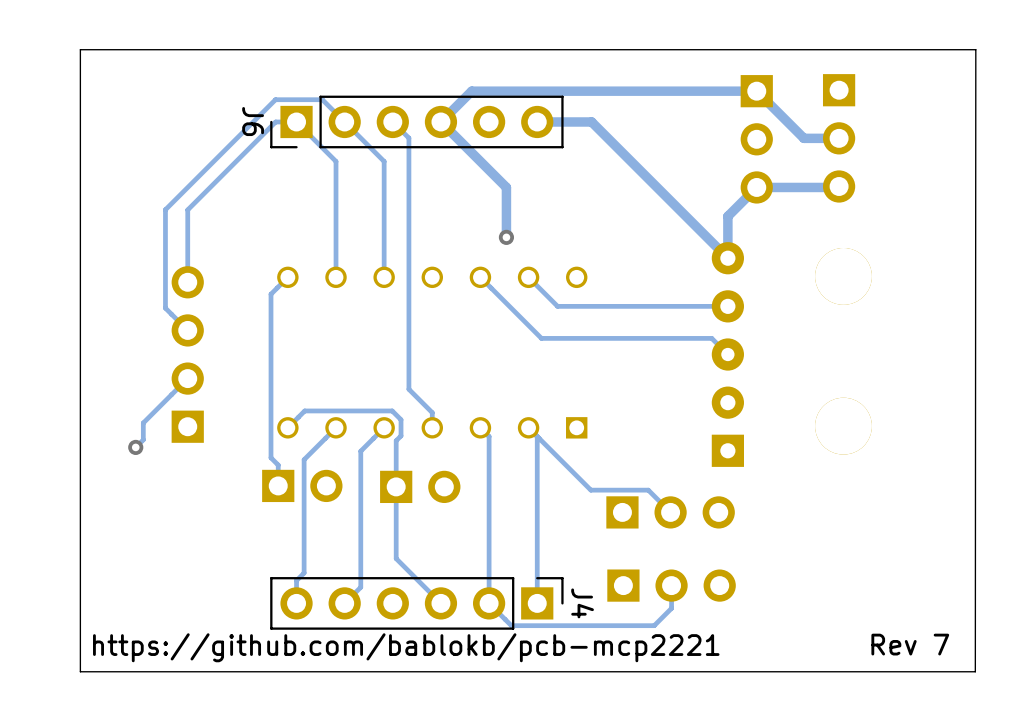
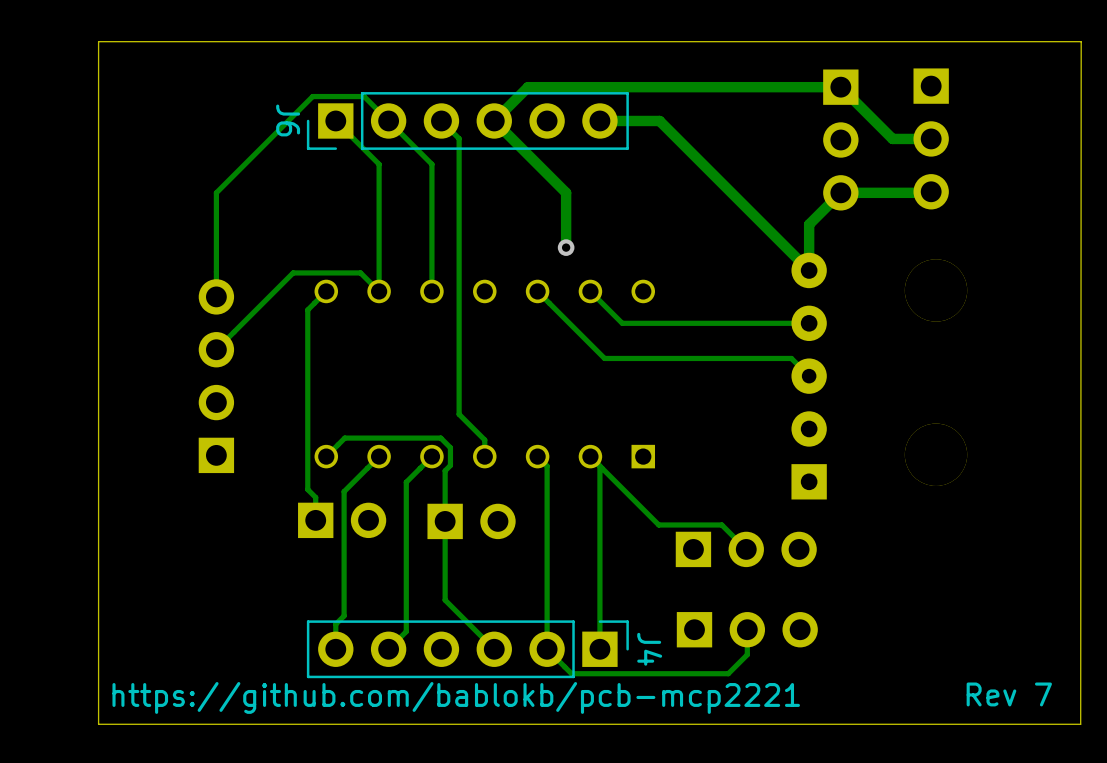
track: (296, 121) (275, 121) (187, 209) -> none
track: (187, 187) (165, 209) (165, 308) (187, 330) -> (216, 192) (216, 217)
track: none -> (379, 291) (360, 272) (293, 272) (216, 349)
track: (187, 378) (143, 422) (143, 439) (135, 447) -> none
via: (135, 447) -> none

